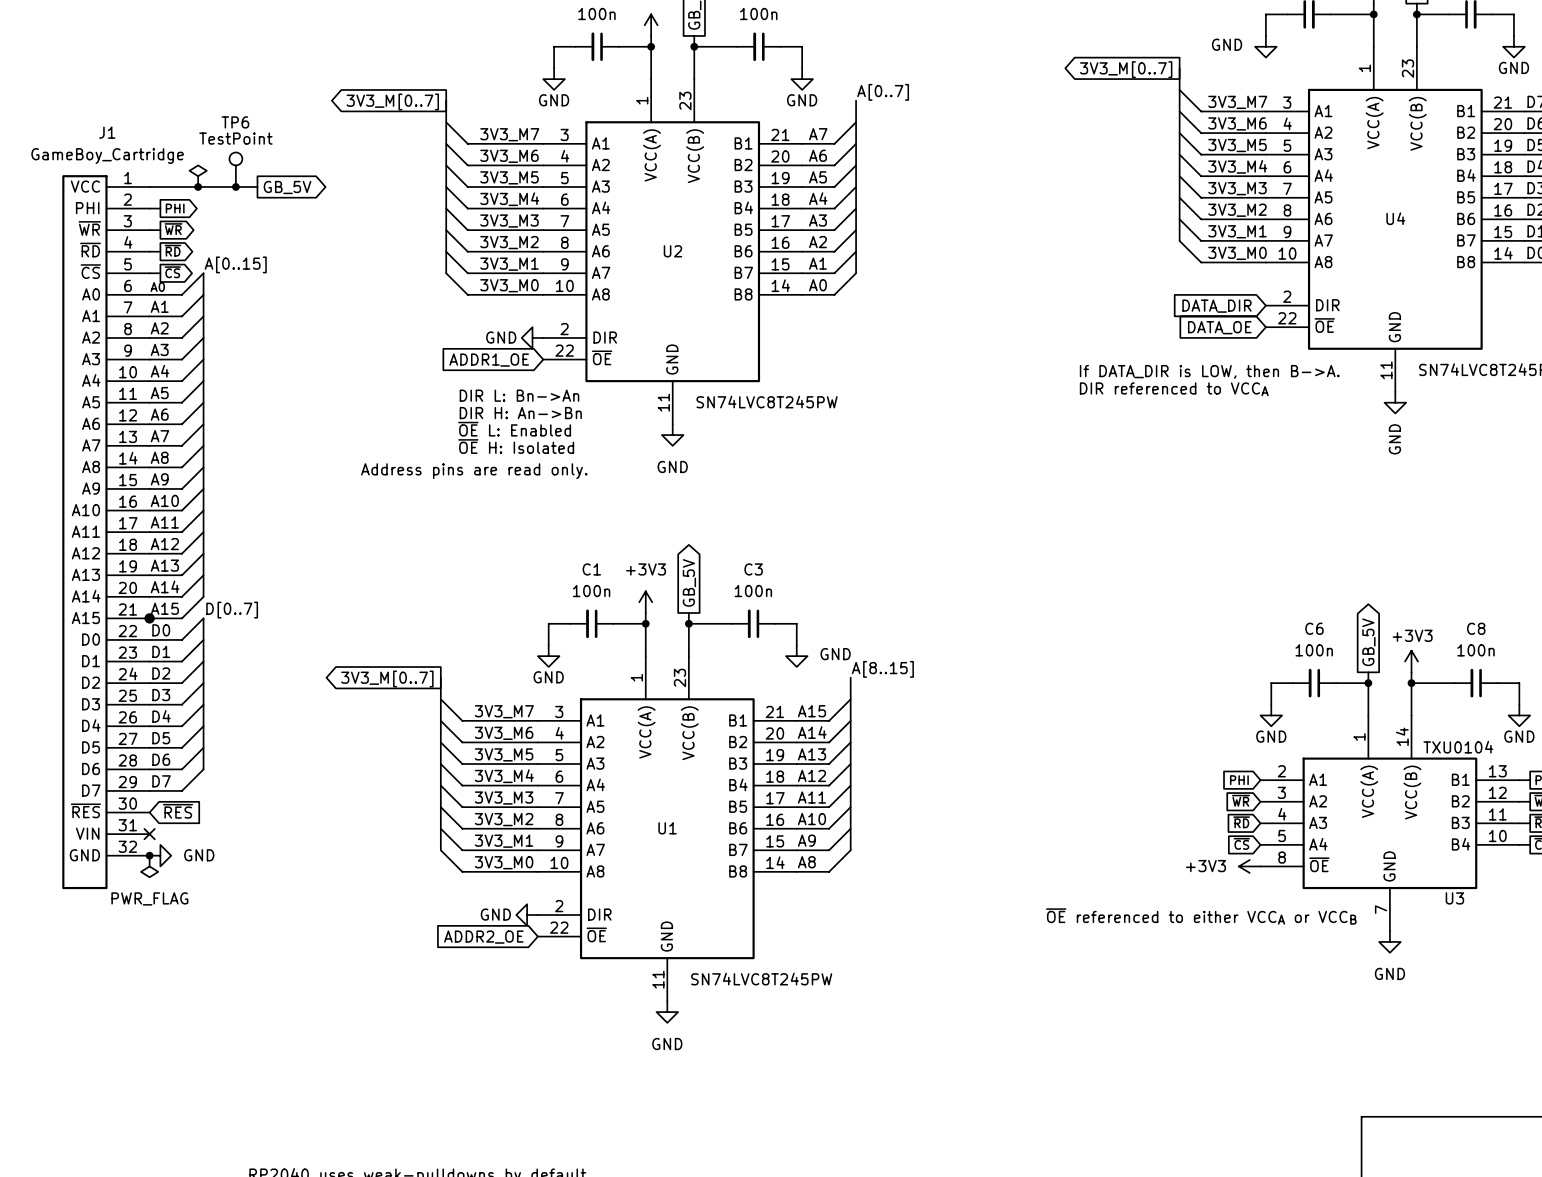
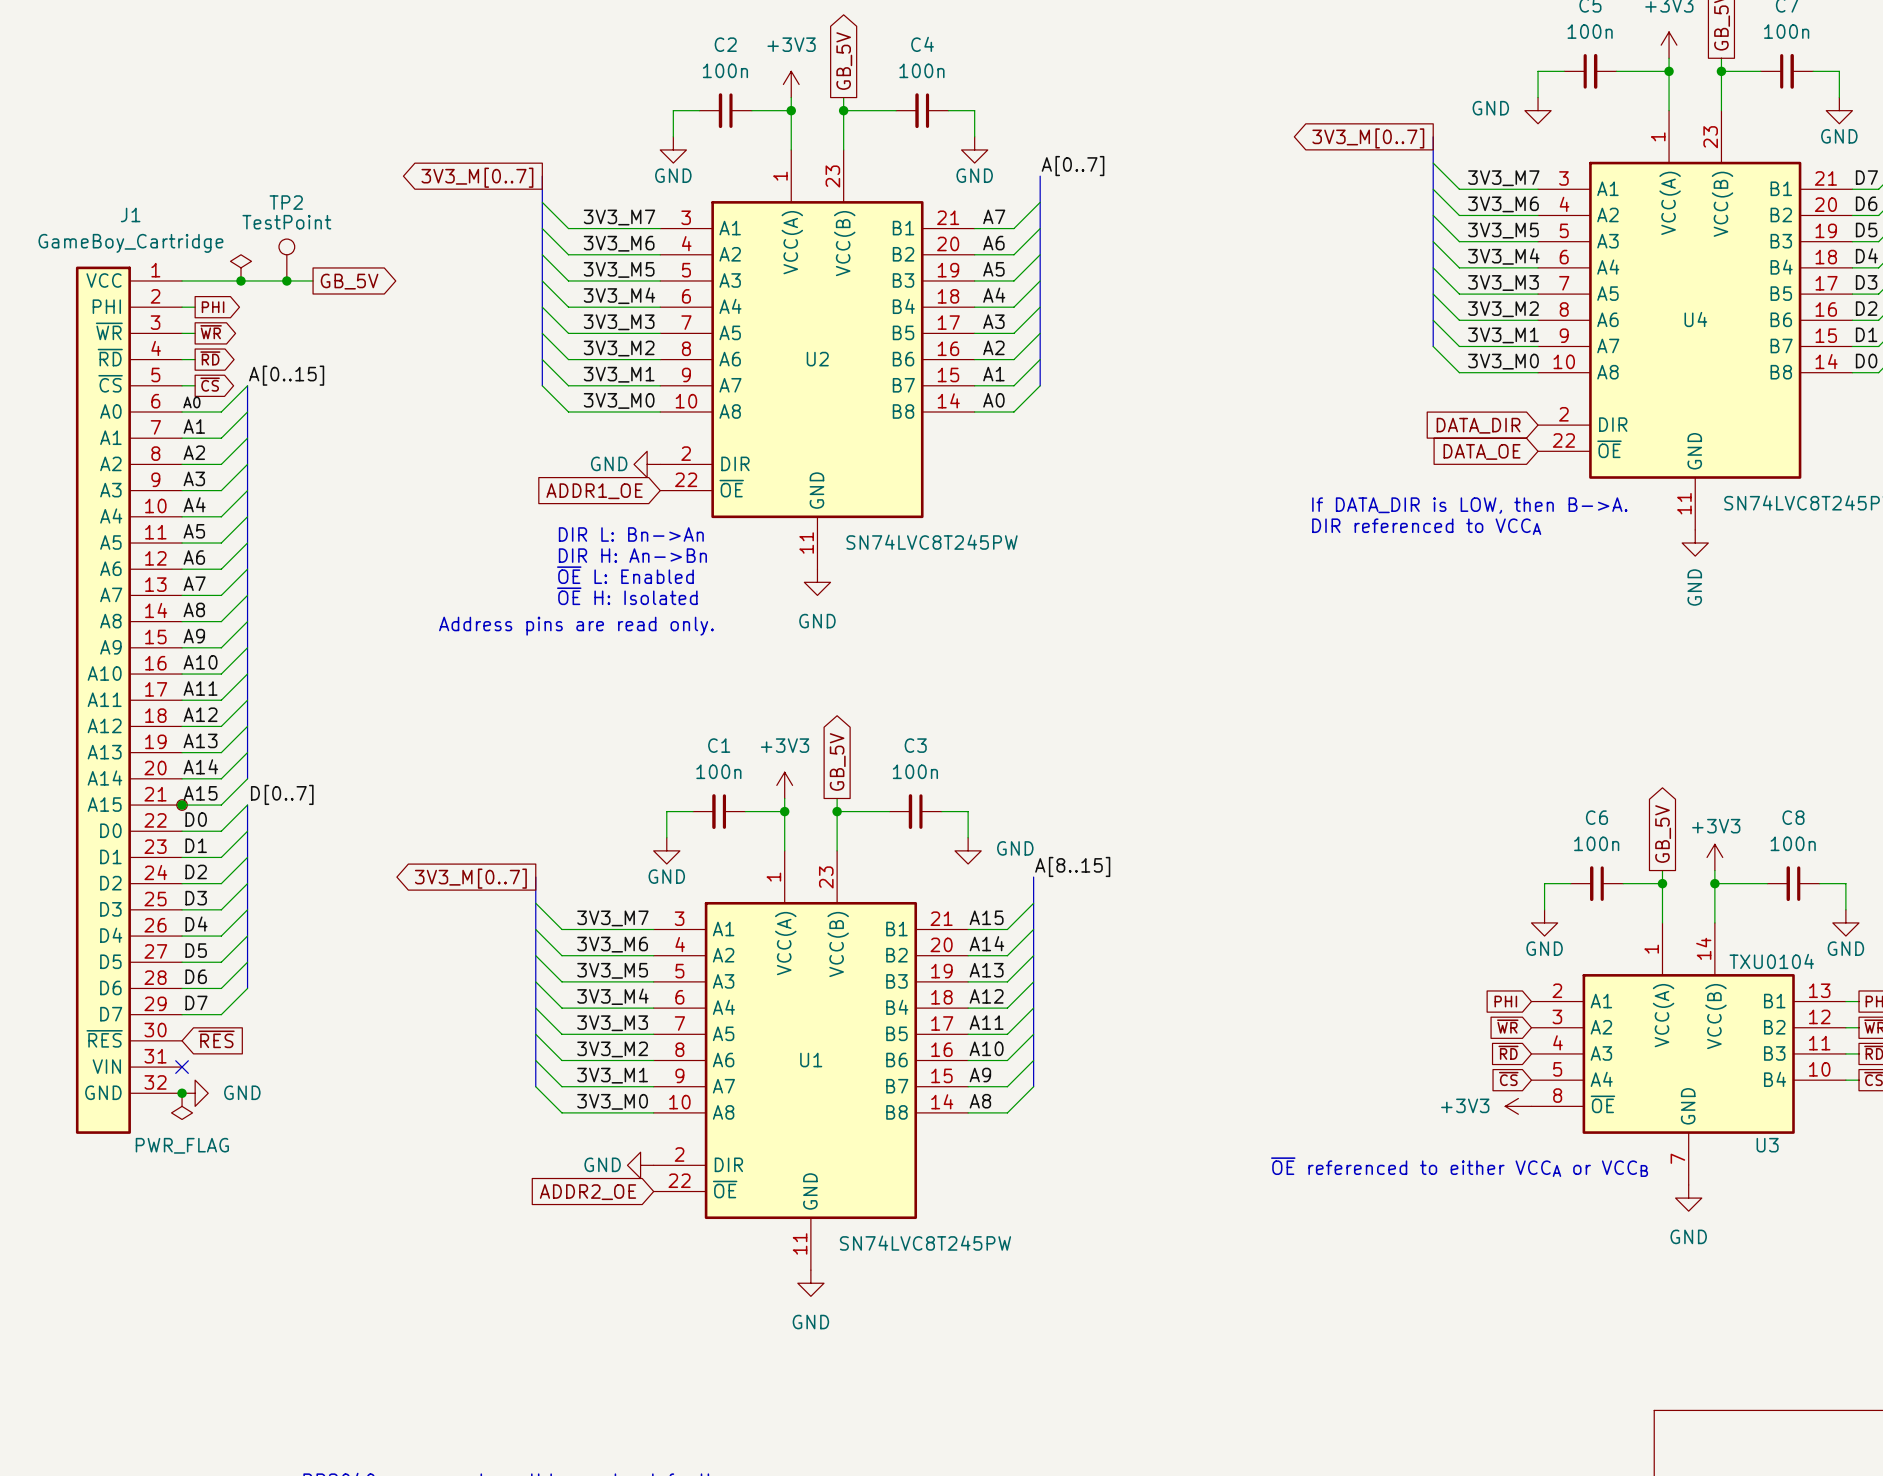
TP6 name: TP6 (235, 122) -> TP2 (286, 202)

